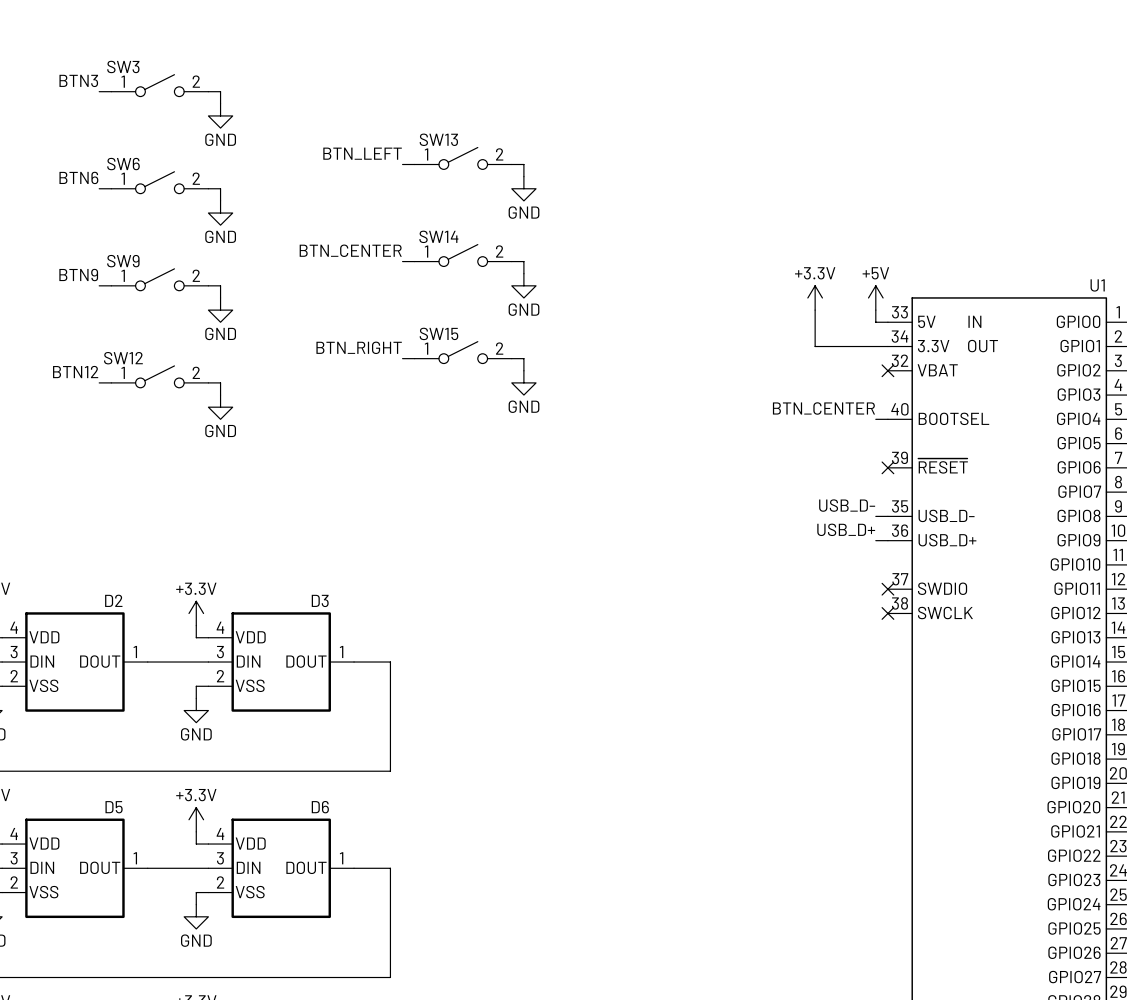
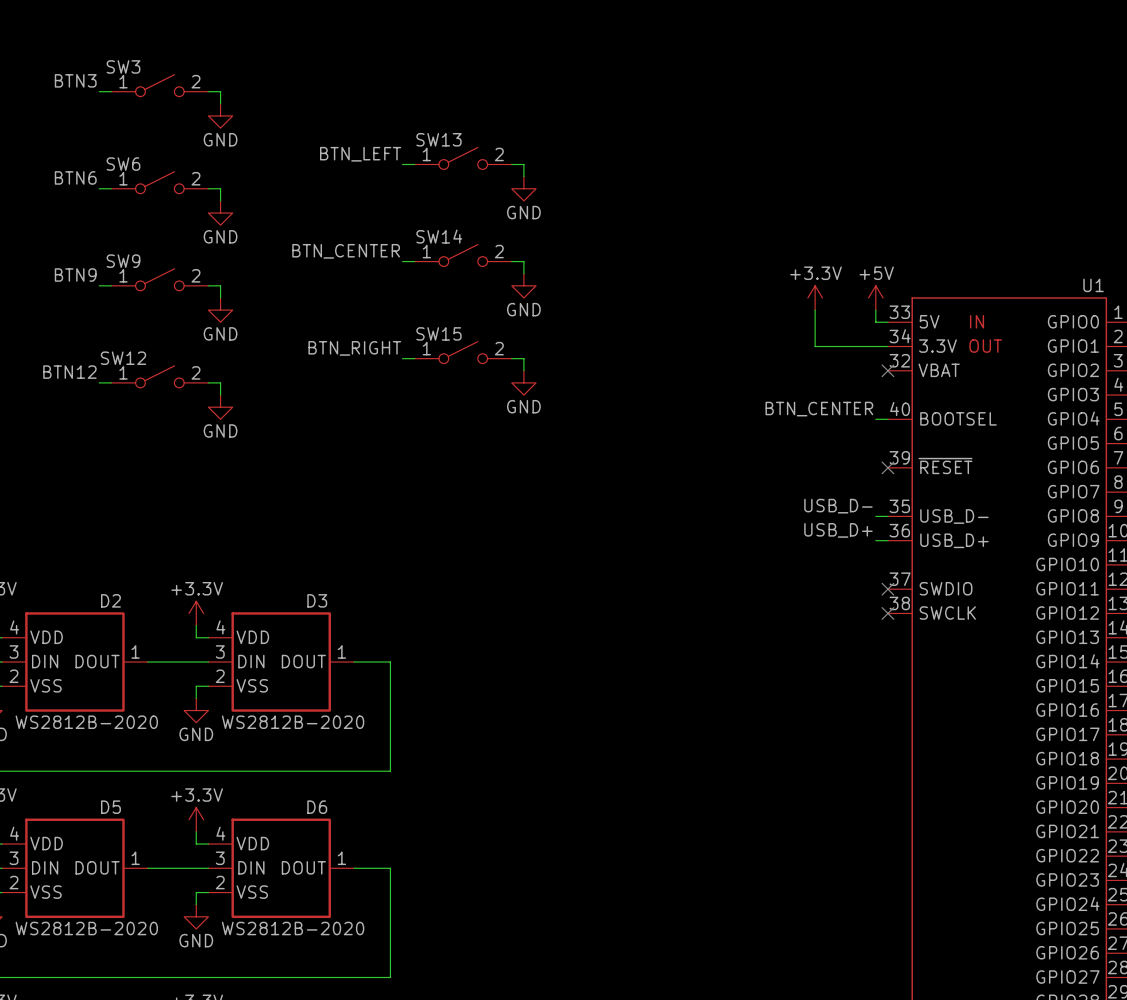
D2 value: none -> WS2812B-2020 (86, 722)
D3 value: none -> WS2812B-2020 (293, 722)
D5 value: none -> WS2812B-2020 (86, 928)
D6 value: none -> WS2812B-2020 (293, 928)

